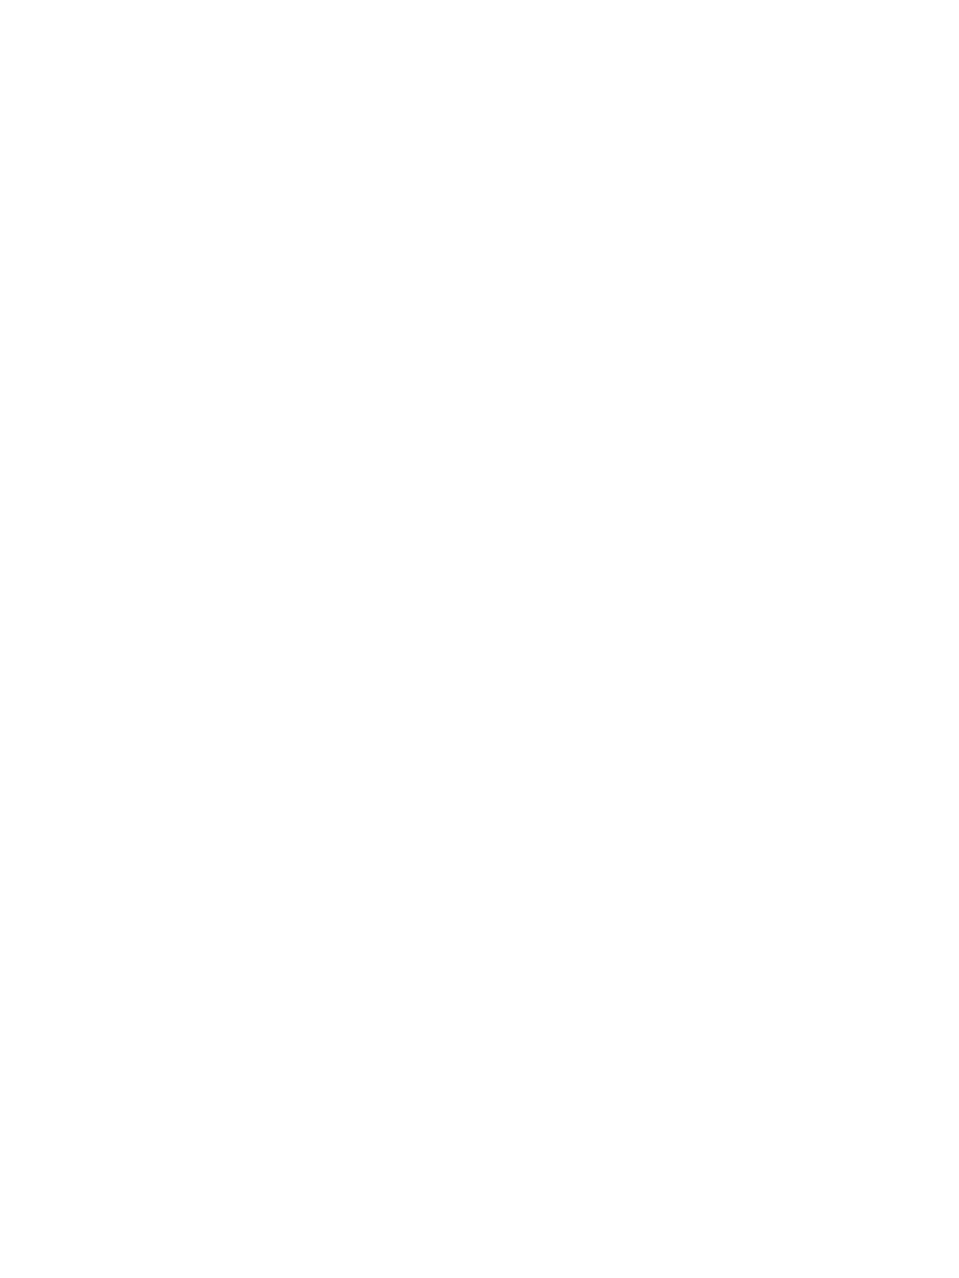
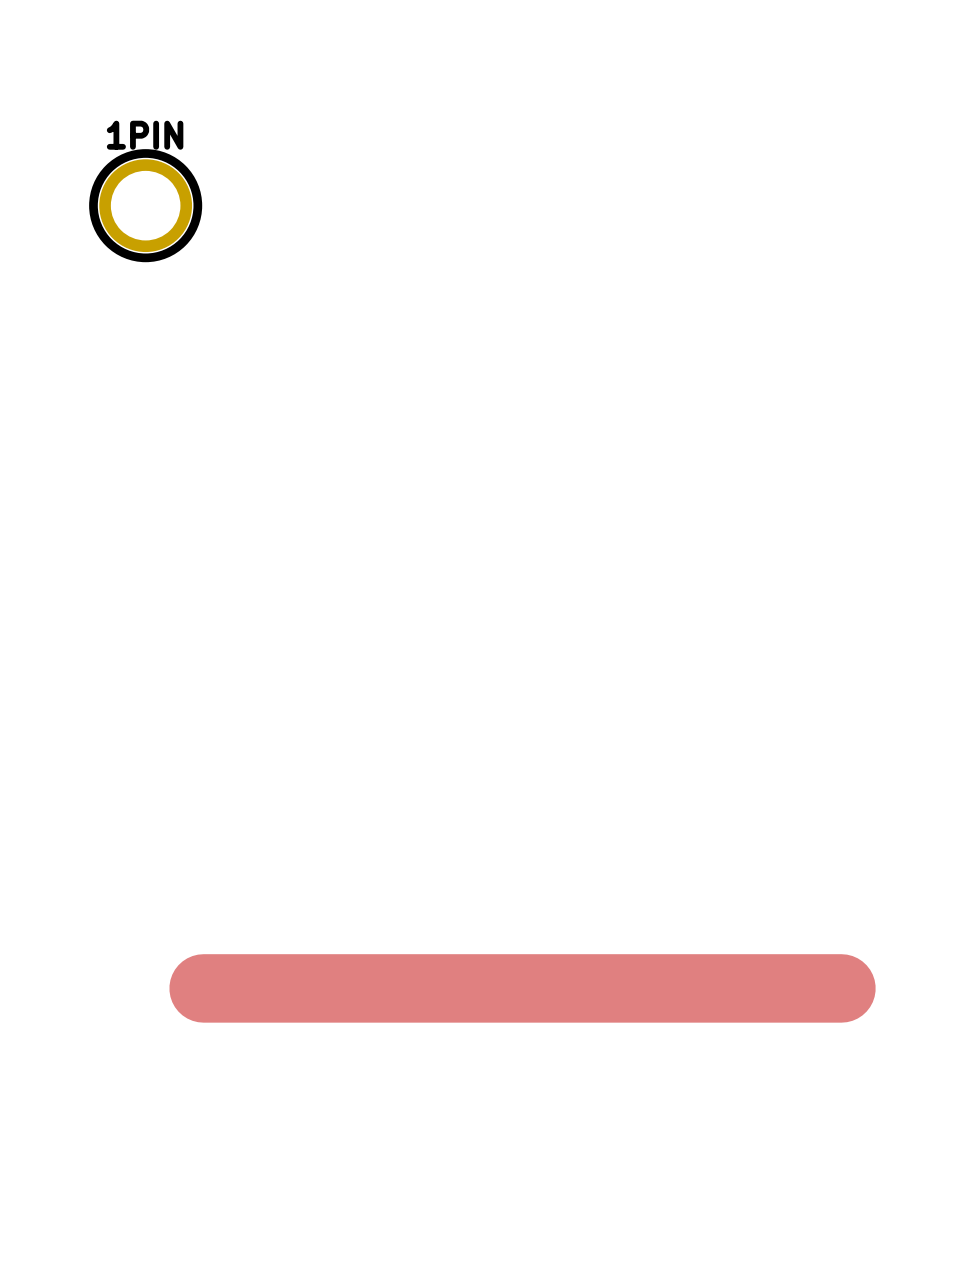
1PIN: none -> (145, 205)
top track: none -> (203, 988) (841, 988)

